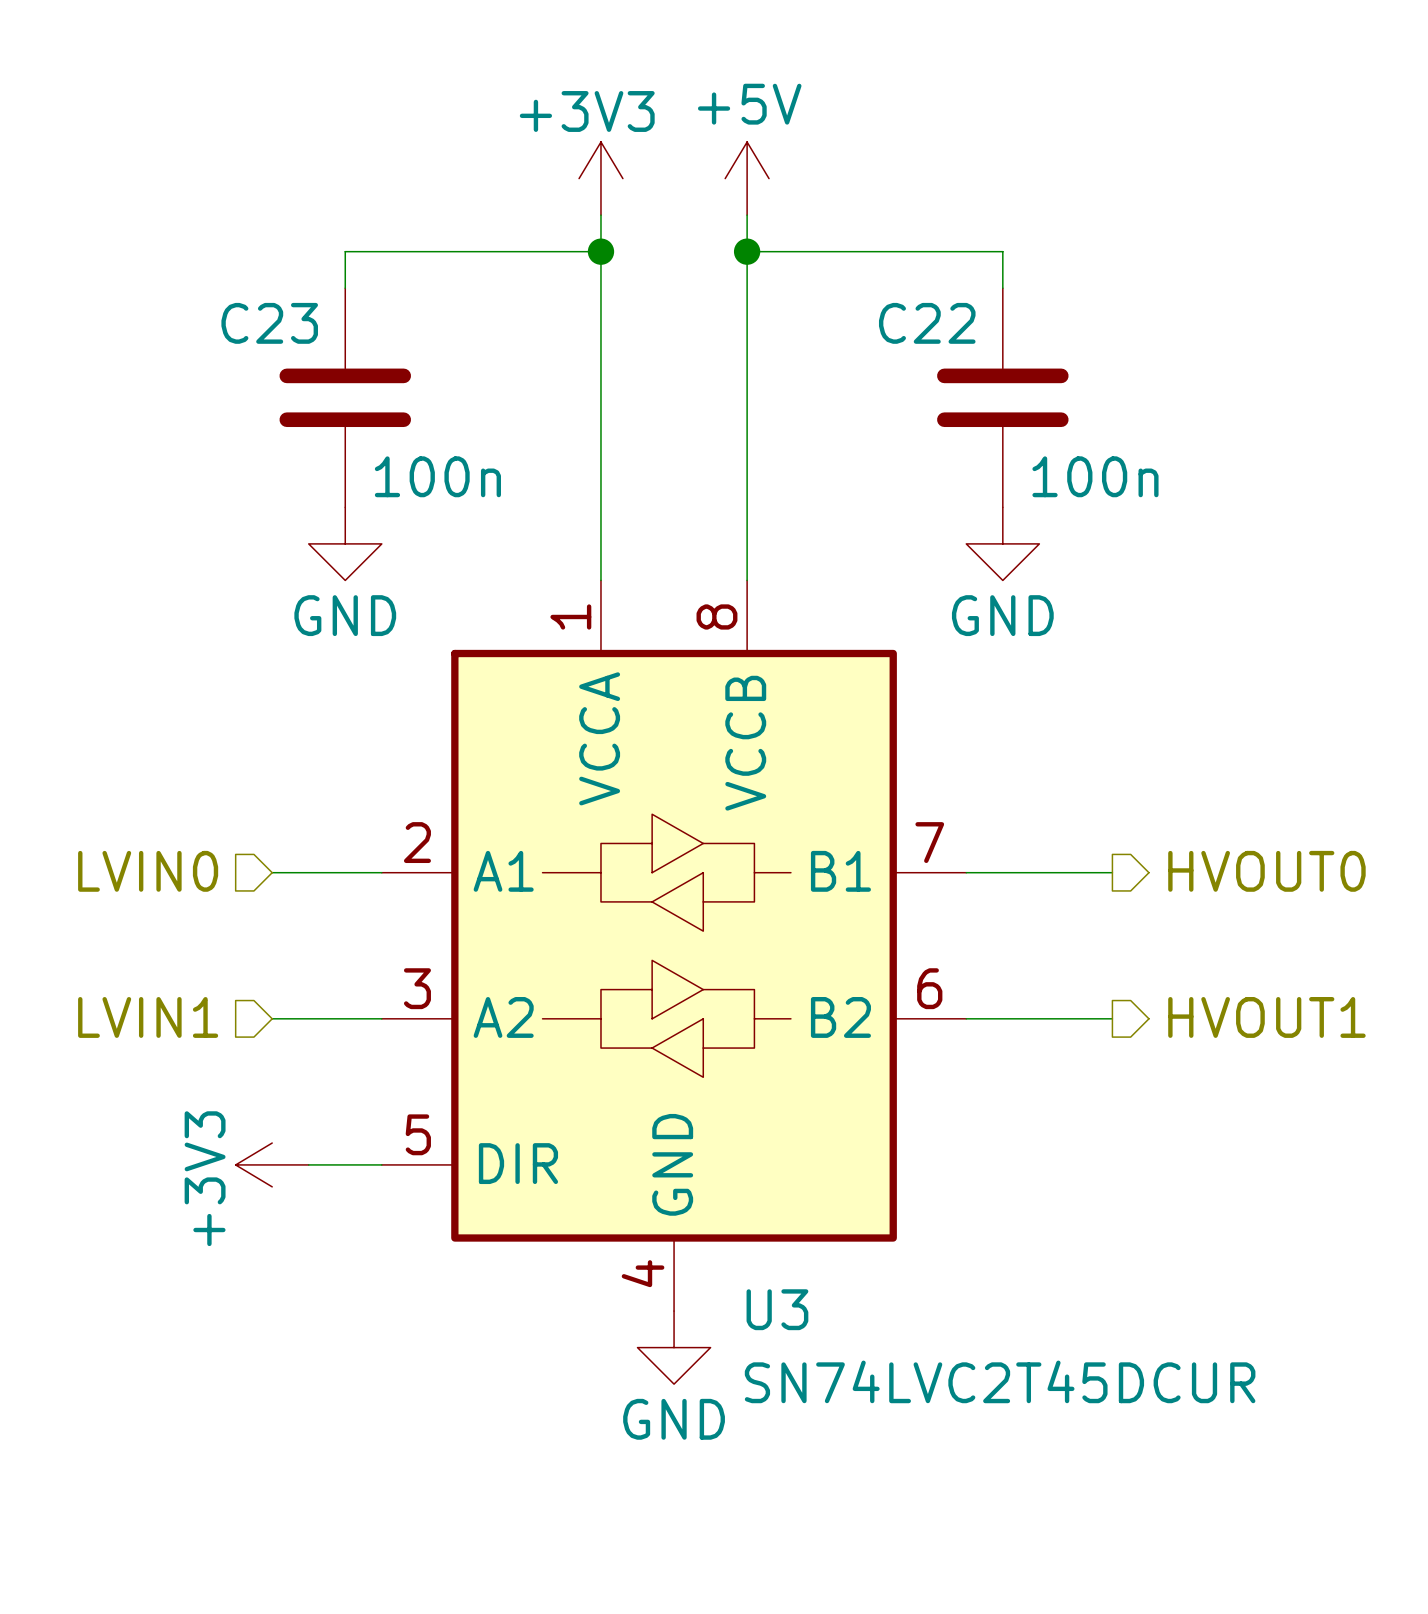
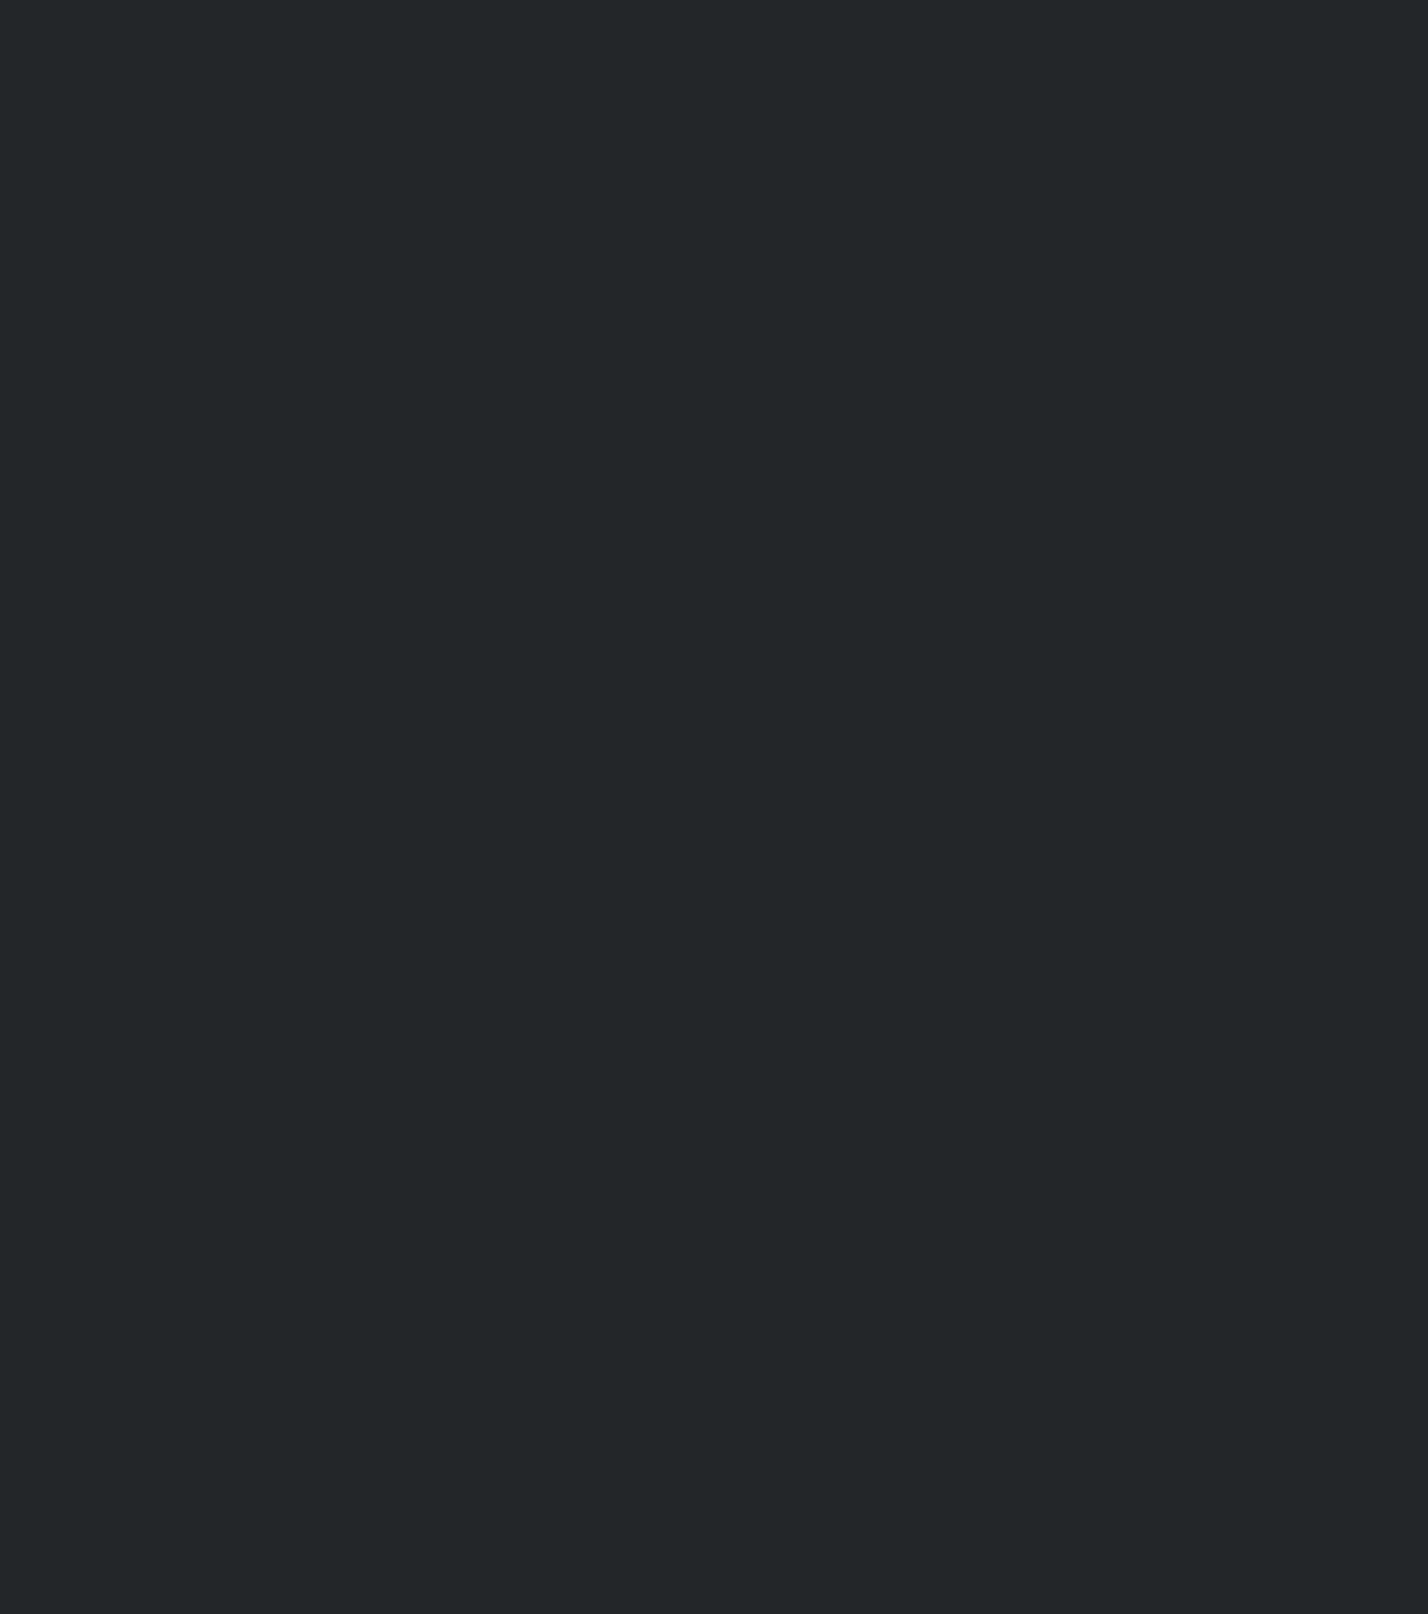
power symbol: +3V3 (600, 178) -> none
power symbol: +5V (747, 178) -> none
wire: (600, 215) (600, 580) -> none
wire: (747, 215) (747, 580) -> none
wire: (600, 251) (345, 251) (345, 288) -> none
junction: (600, 251) -> none
wire: (747, 251) (1002, 251) (1002, 288) -> none
junction: (747, 251) -> none
C23: 100n (345, 397) -> none
C22: 100n (1002, 397) -> none
power symbol: GND (345, 543) -> none
power symbol: GND (1002, 543) -> none
hierarchical label: LVIN0 (148, 871) -> none
hierarchical label: HVOUT0 (1266, 871) -> none
wire: (272, 872) (381, 872) -> none
wire: (966, 872) (1112, 872) -> none
U3: SN74LVC2T45DCUR (674, 945) -> none
hierarchical label: LVIN1 (148, 1017) -> none
hierarchical label: HVOUT1 (1266, 1017) -> none
wire: (272, 1018) (381, 1018) -> none
wire: (966, 1018) (1112, 1018) -> none
power symbol: +3V3 (272, 1164) -> none
wire: (308, 1164) (381, 1164) -> none
power symbol: GND (674, 1347) -> none

